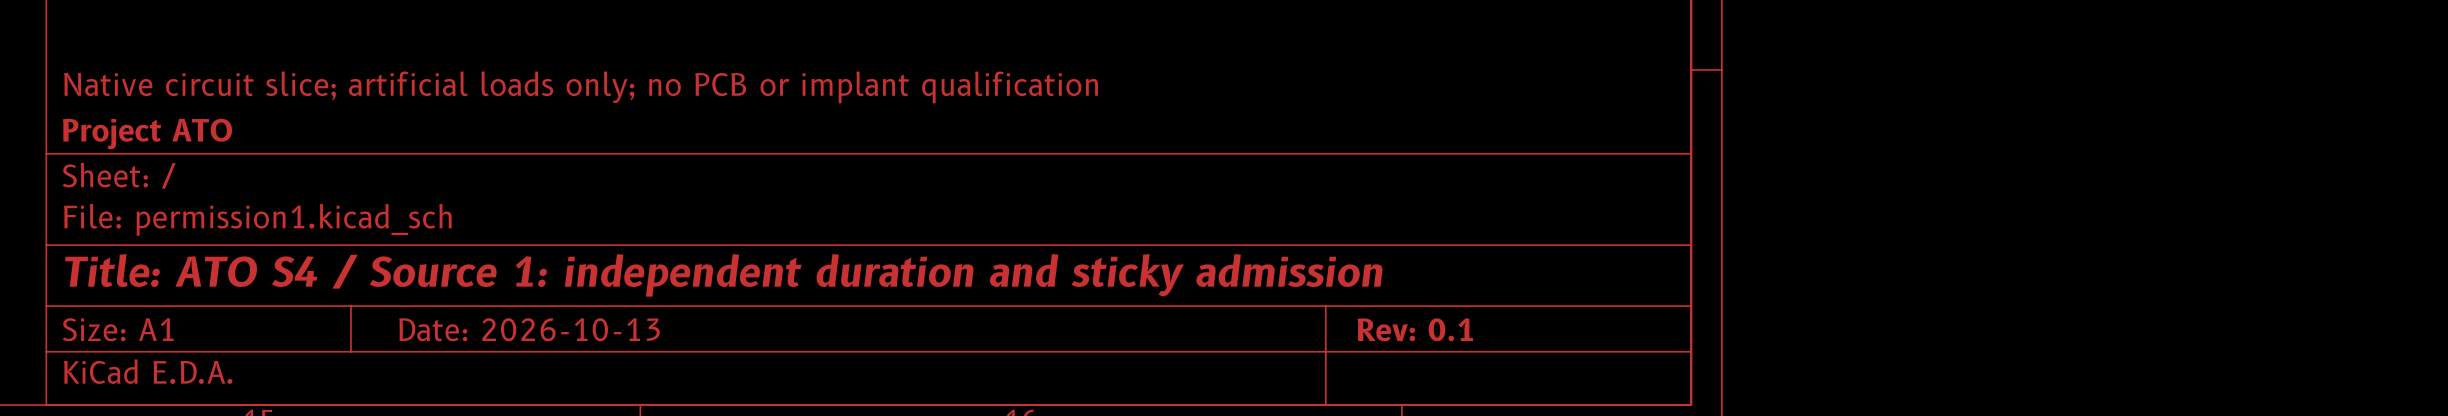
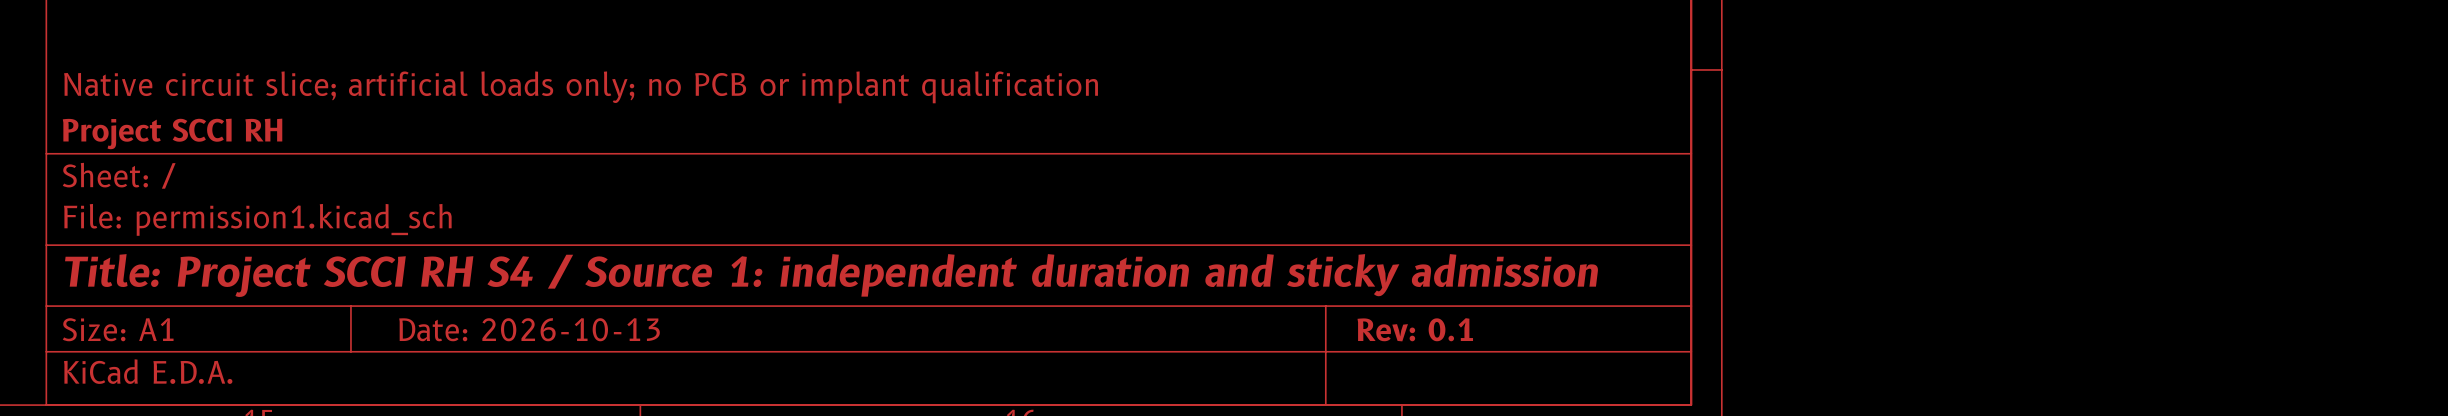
title block: Project ATO (147, 133) -> Project SCCI RH (172, 133)
title block: Title: ATO S4 / Source 1: independent duration and sticky admission (723, 275) -> Title: Project SCCI RH S4 / Source 1: independent duration and sticky admission (831, 275)

